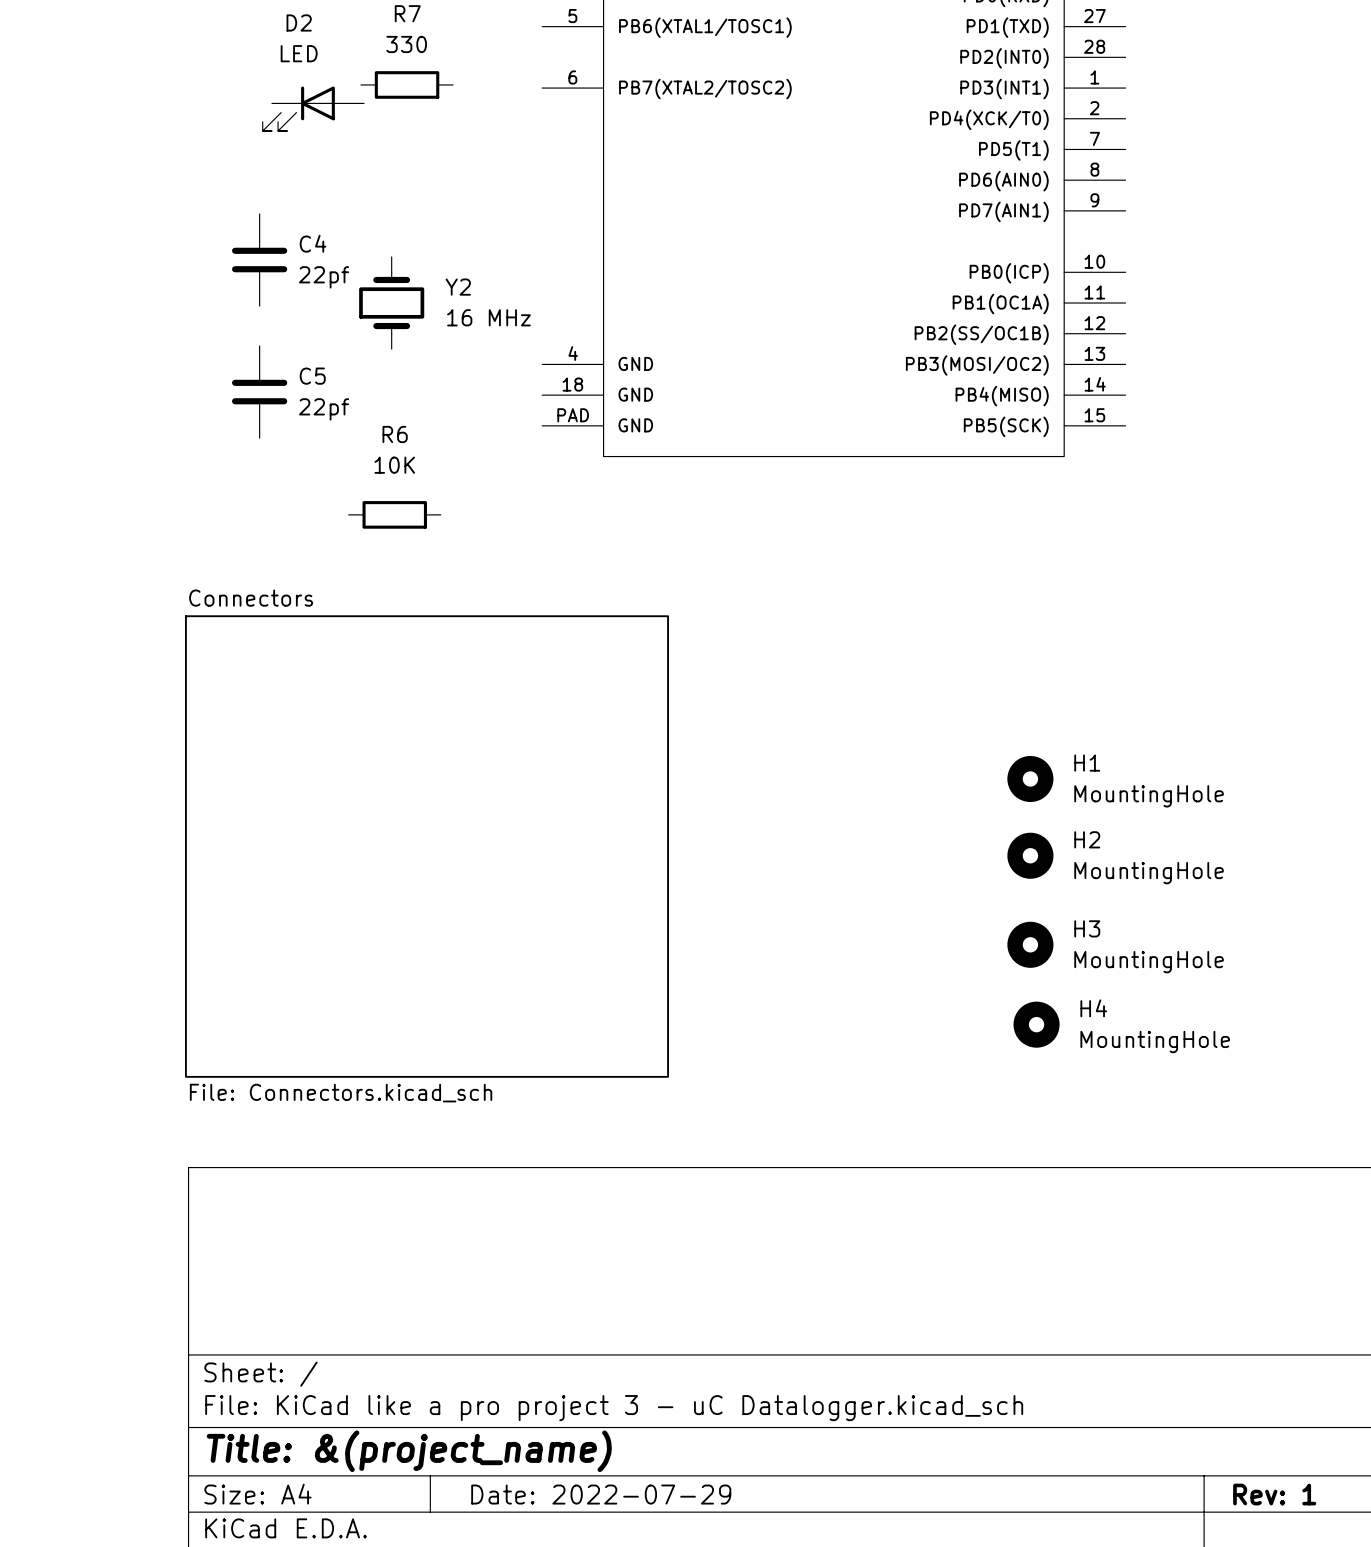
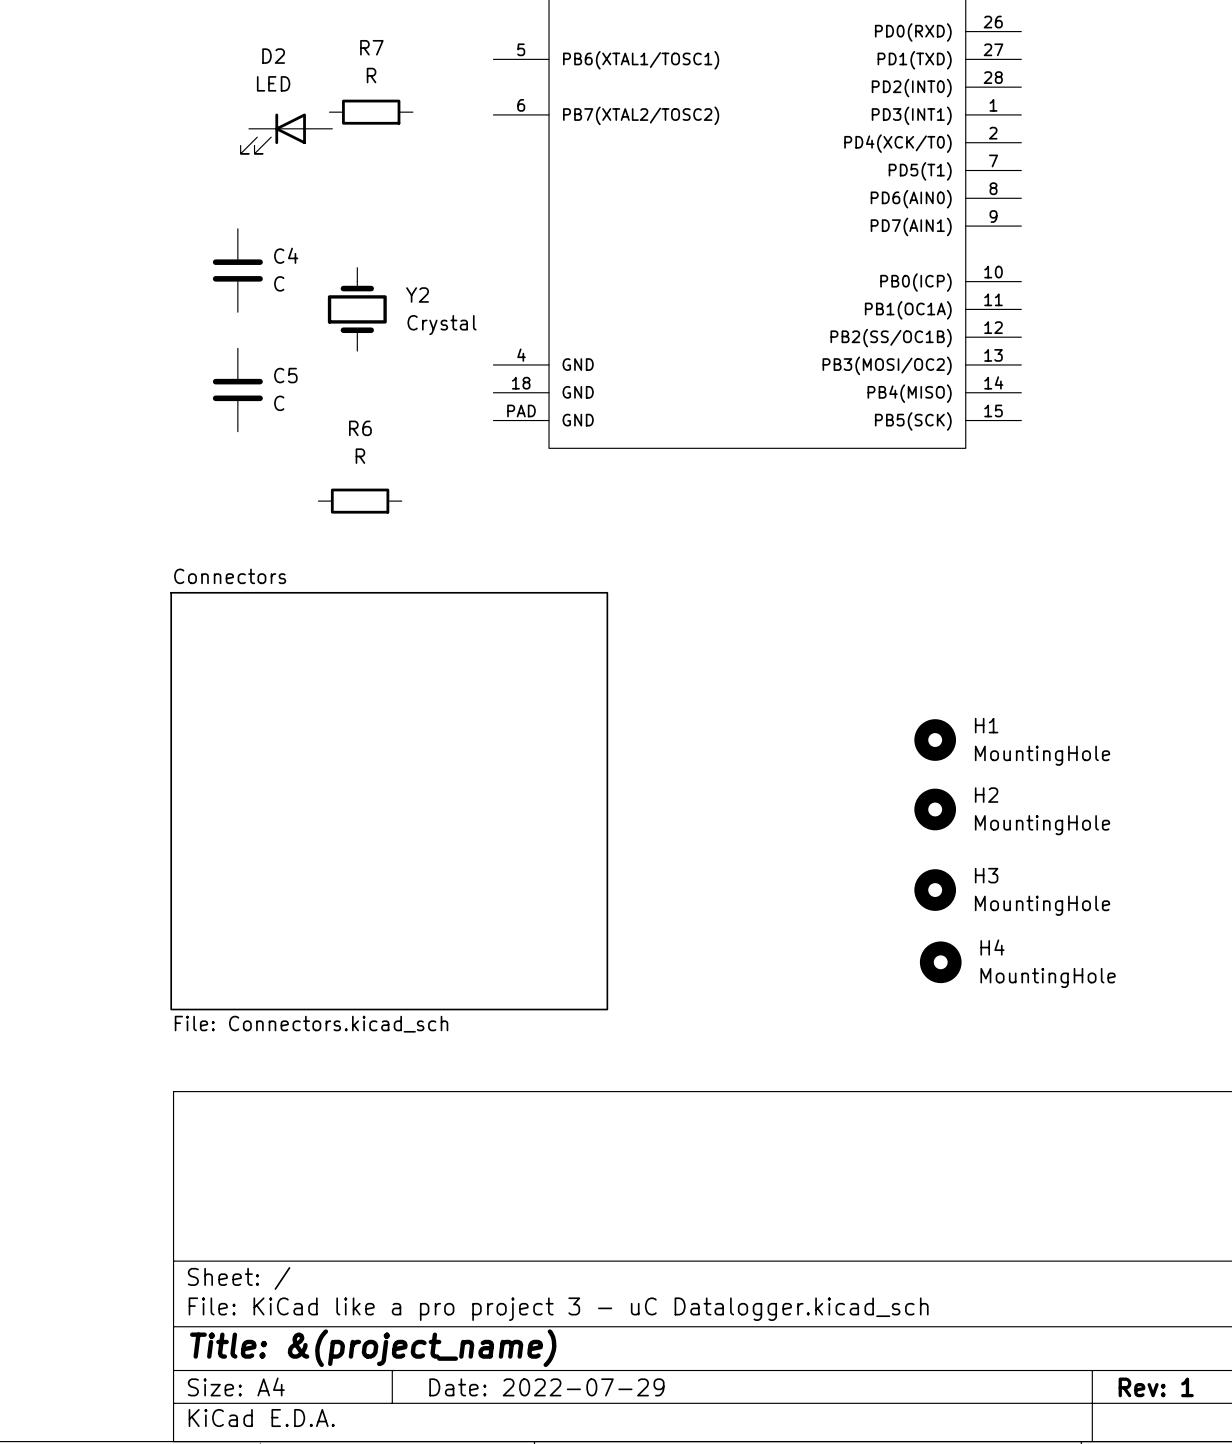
R7 value: 330 (406, 44) -> R (371, 75)
C4 value: 22pf (324, 277) -> C (279, 283)
Y2 value: 16 MHz (488, 317) -> Crystal (442, 325)
C5 value: 22pf (324, 409) -> C (279, 403)
R6 value: 10K (394, 465) -> R (360, 456)

